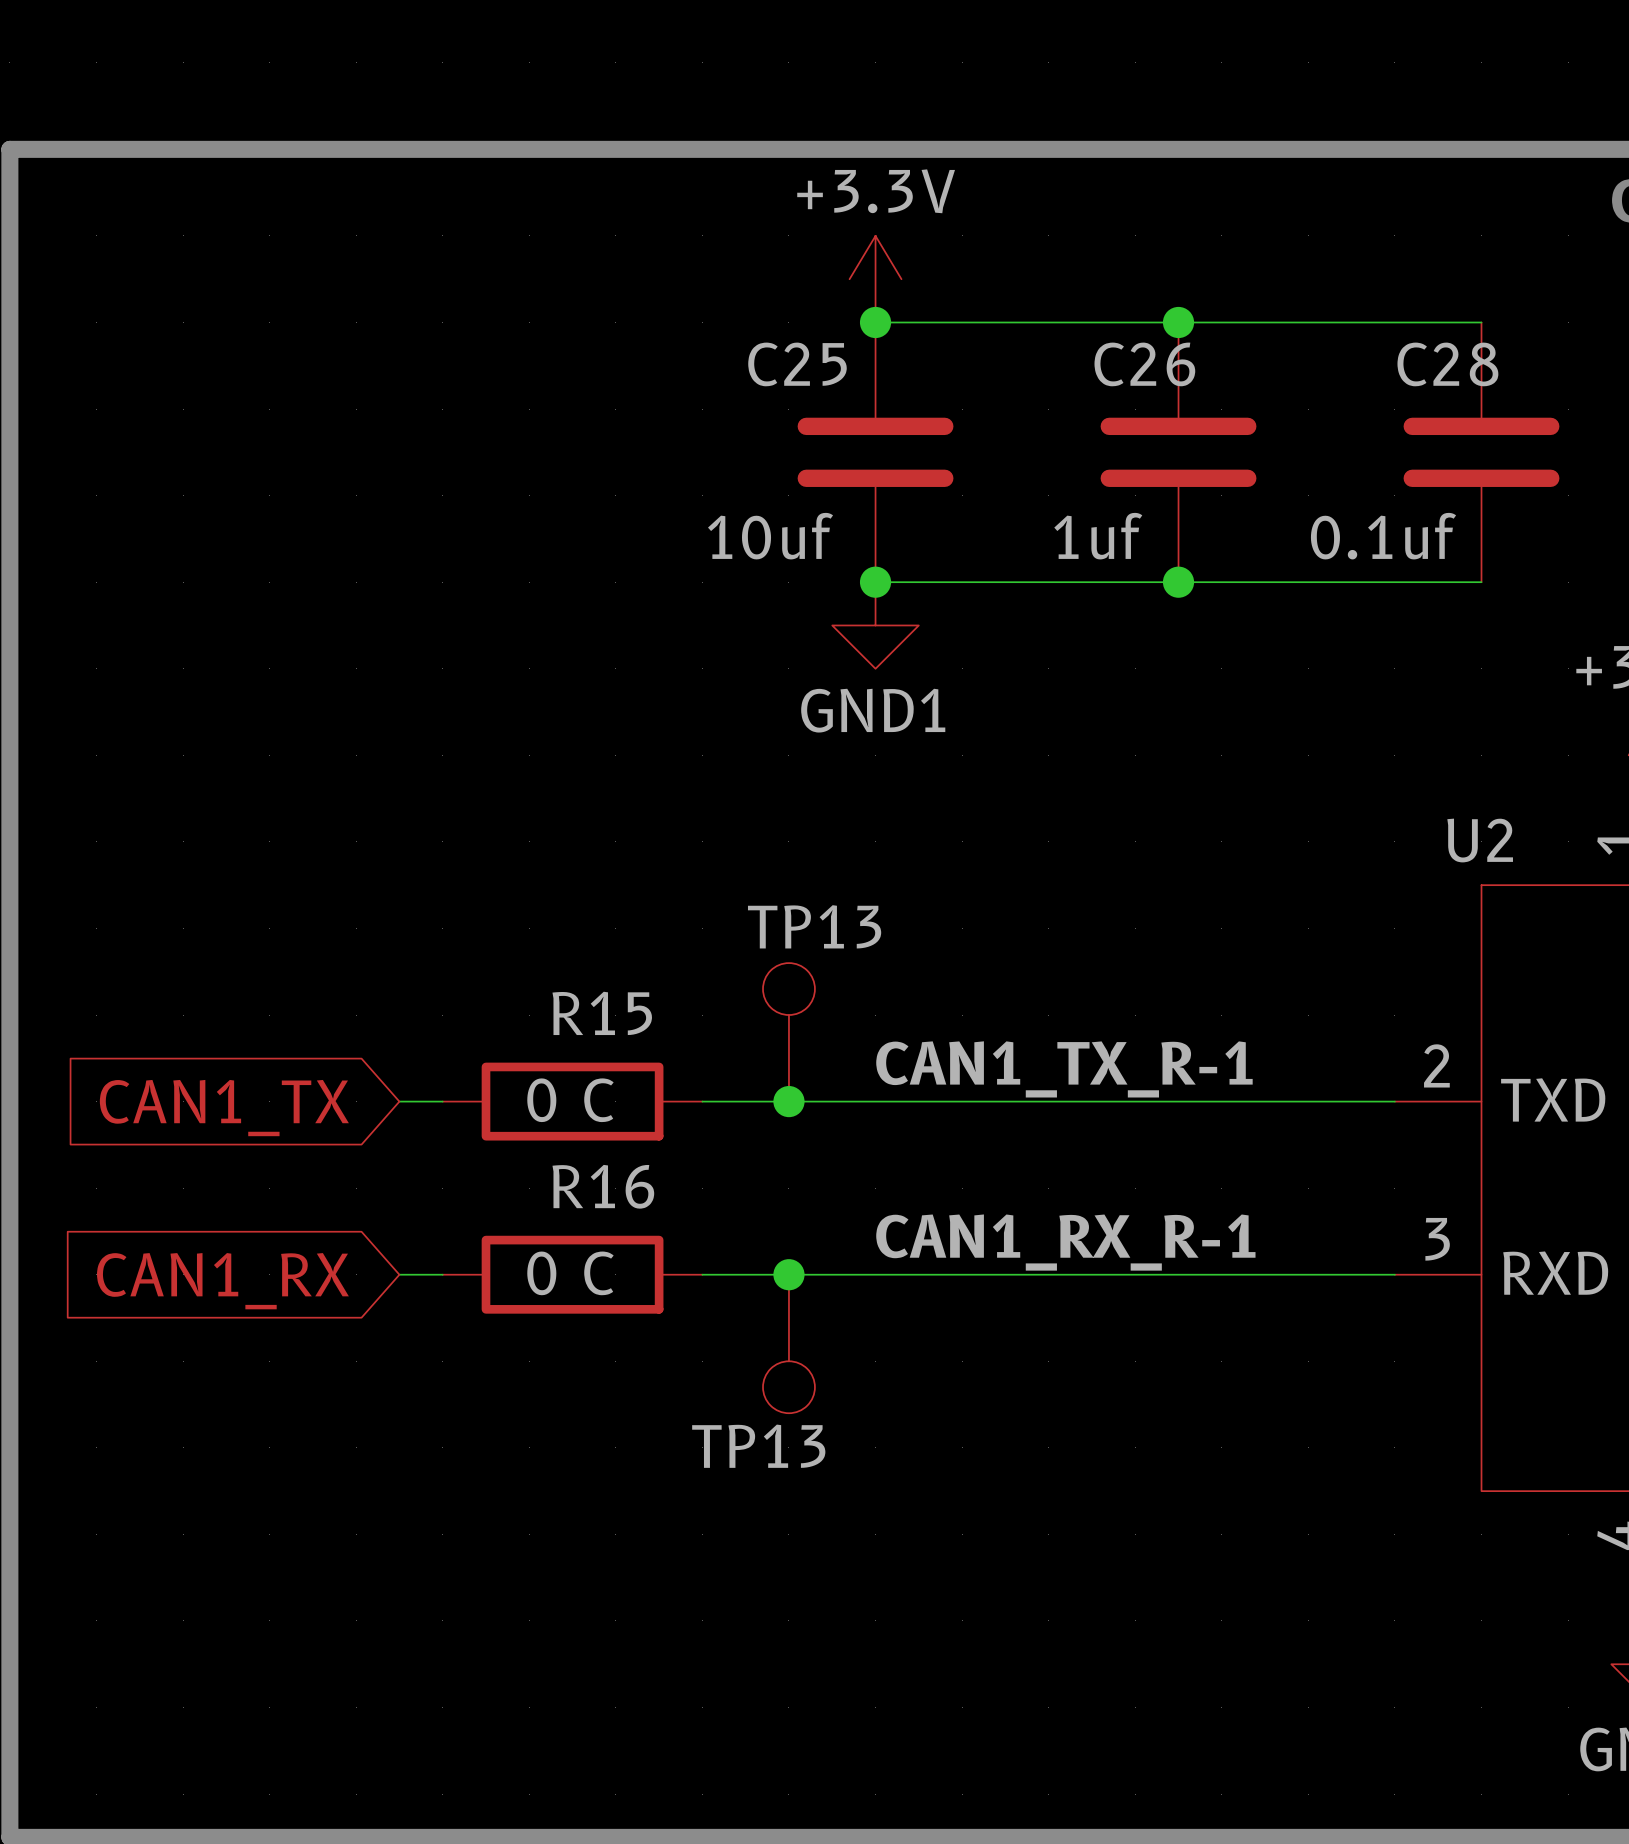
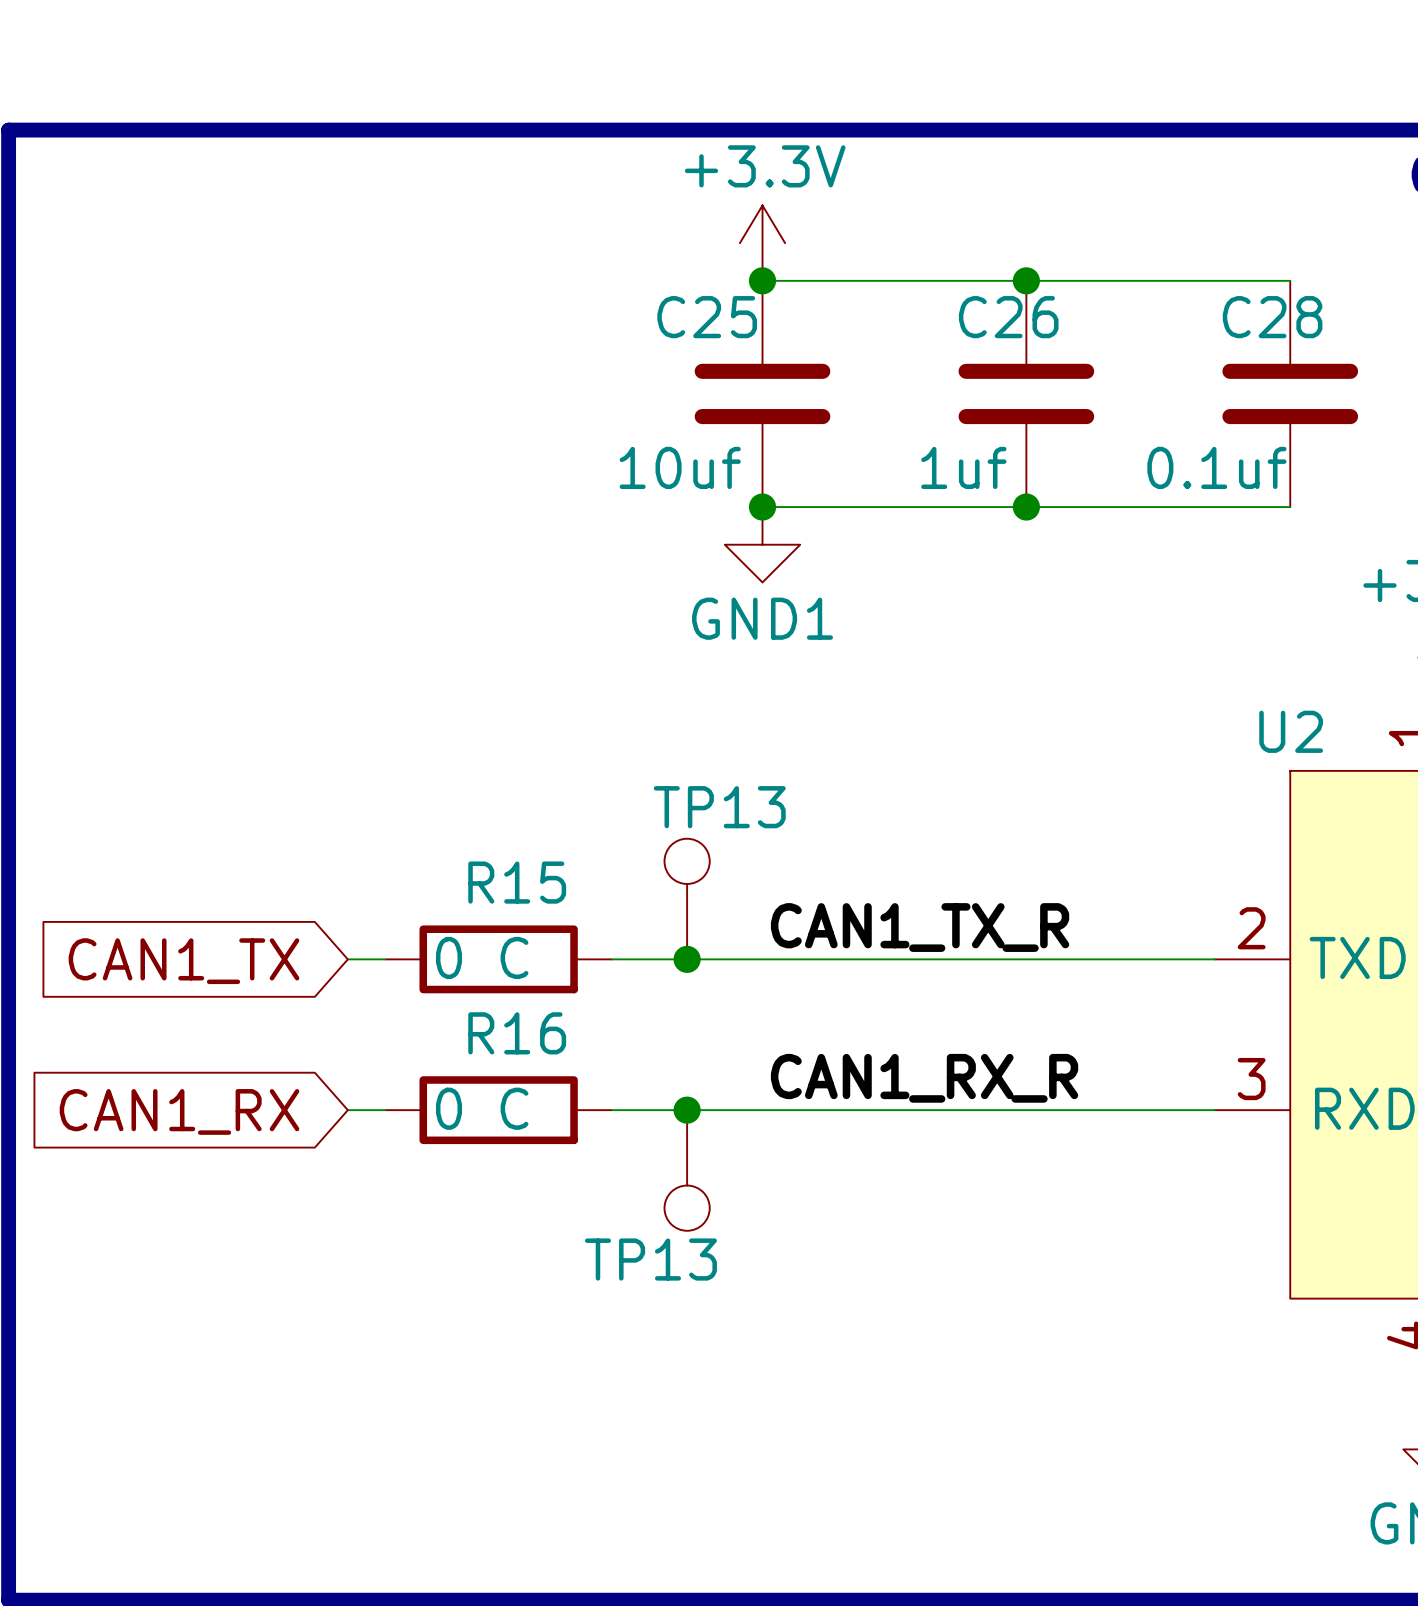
label: CAN1_TX_R-1 (1064, 1069) -> CAN1_TX_R (920, 927)
label: CAN1_RX_R-1 (1065, 1242) -> CAN1_RX_R (924, 1078)

